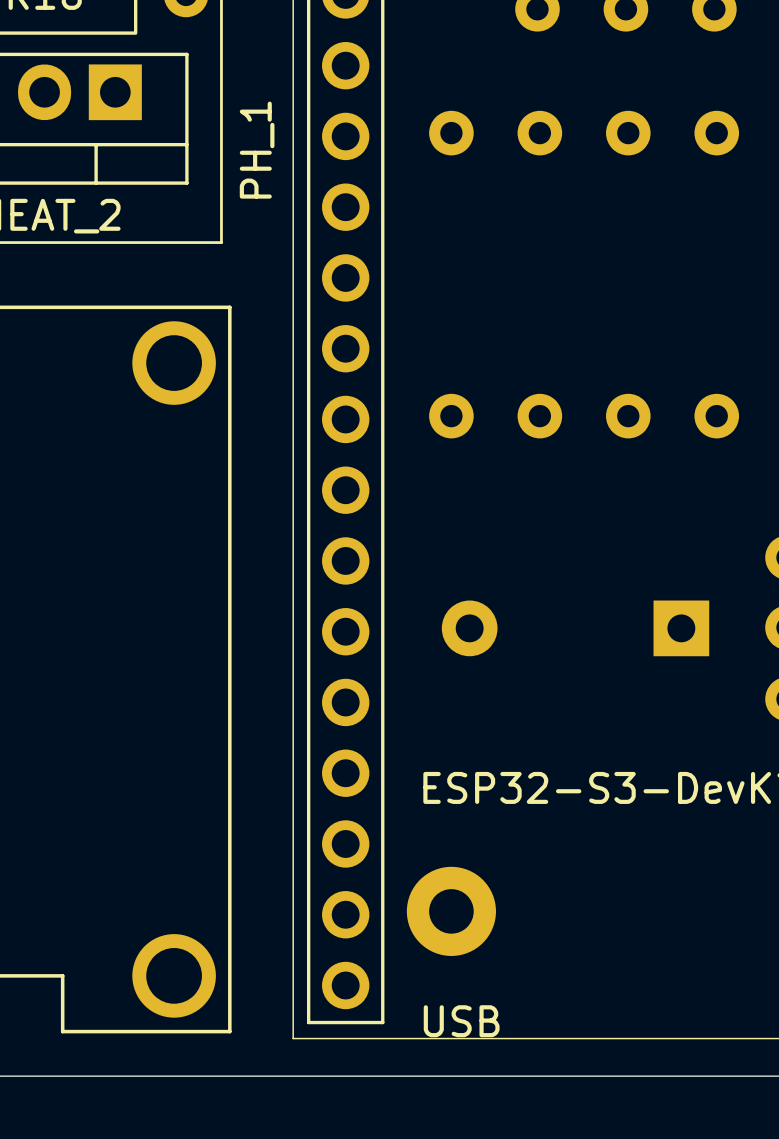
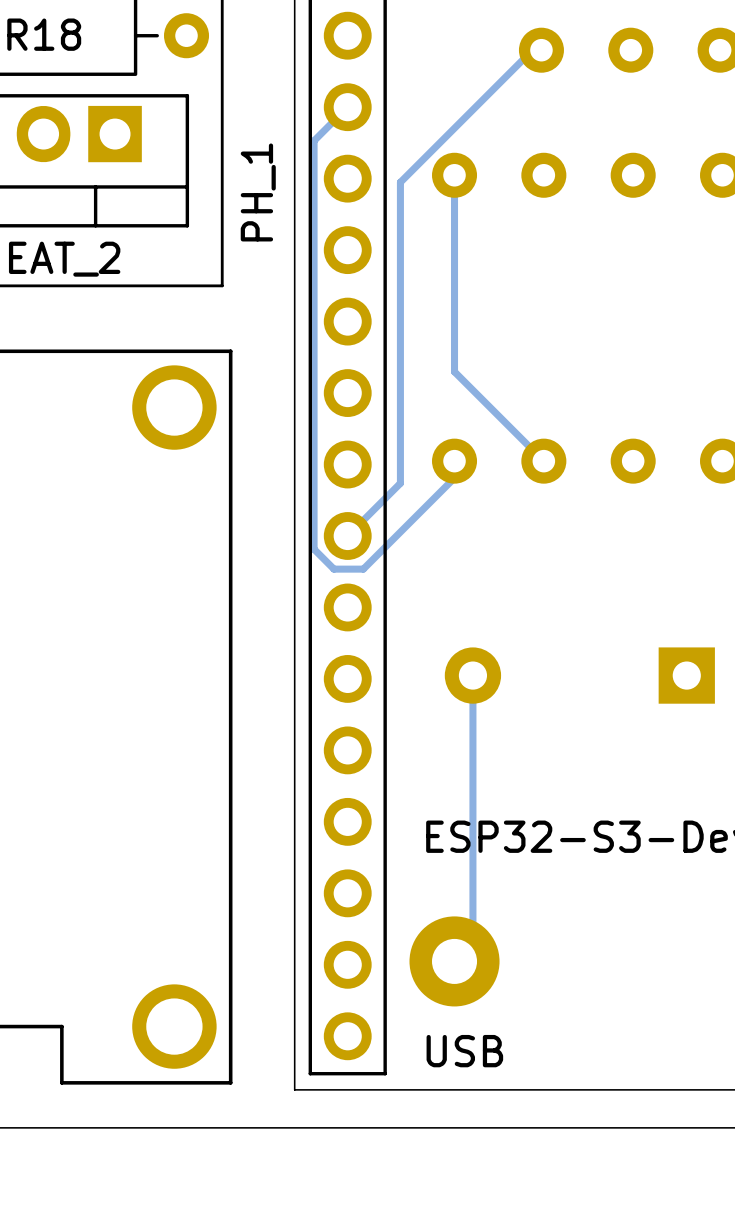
bottom track: none -> (541, 50) (532, 50) (400, 182) (400, 483) (347, 535)
bottom track: none -> (347, 107) (314, 140) (314, 549) (333, 569) (363, 569) (454, 477) (454, 461)
bottom track: none -> (454, 175) (454, 371) (543, 461)
bottom track: none -> (472, 675) (472, 925) (454, 943)
text position: USB (461, 1021) -> USB (464, 1051)

